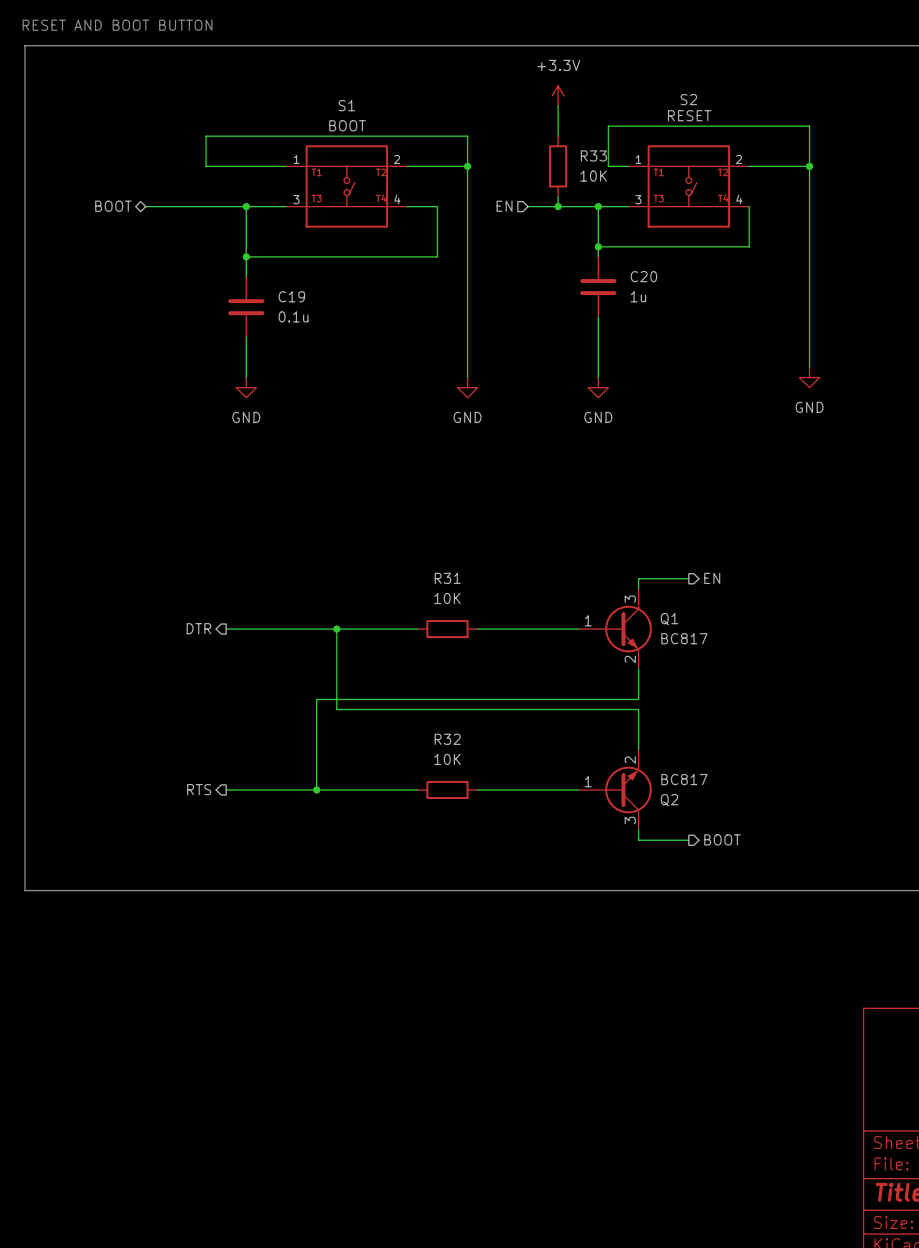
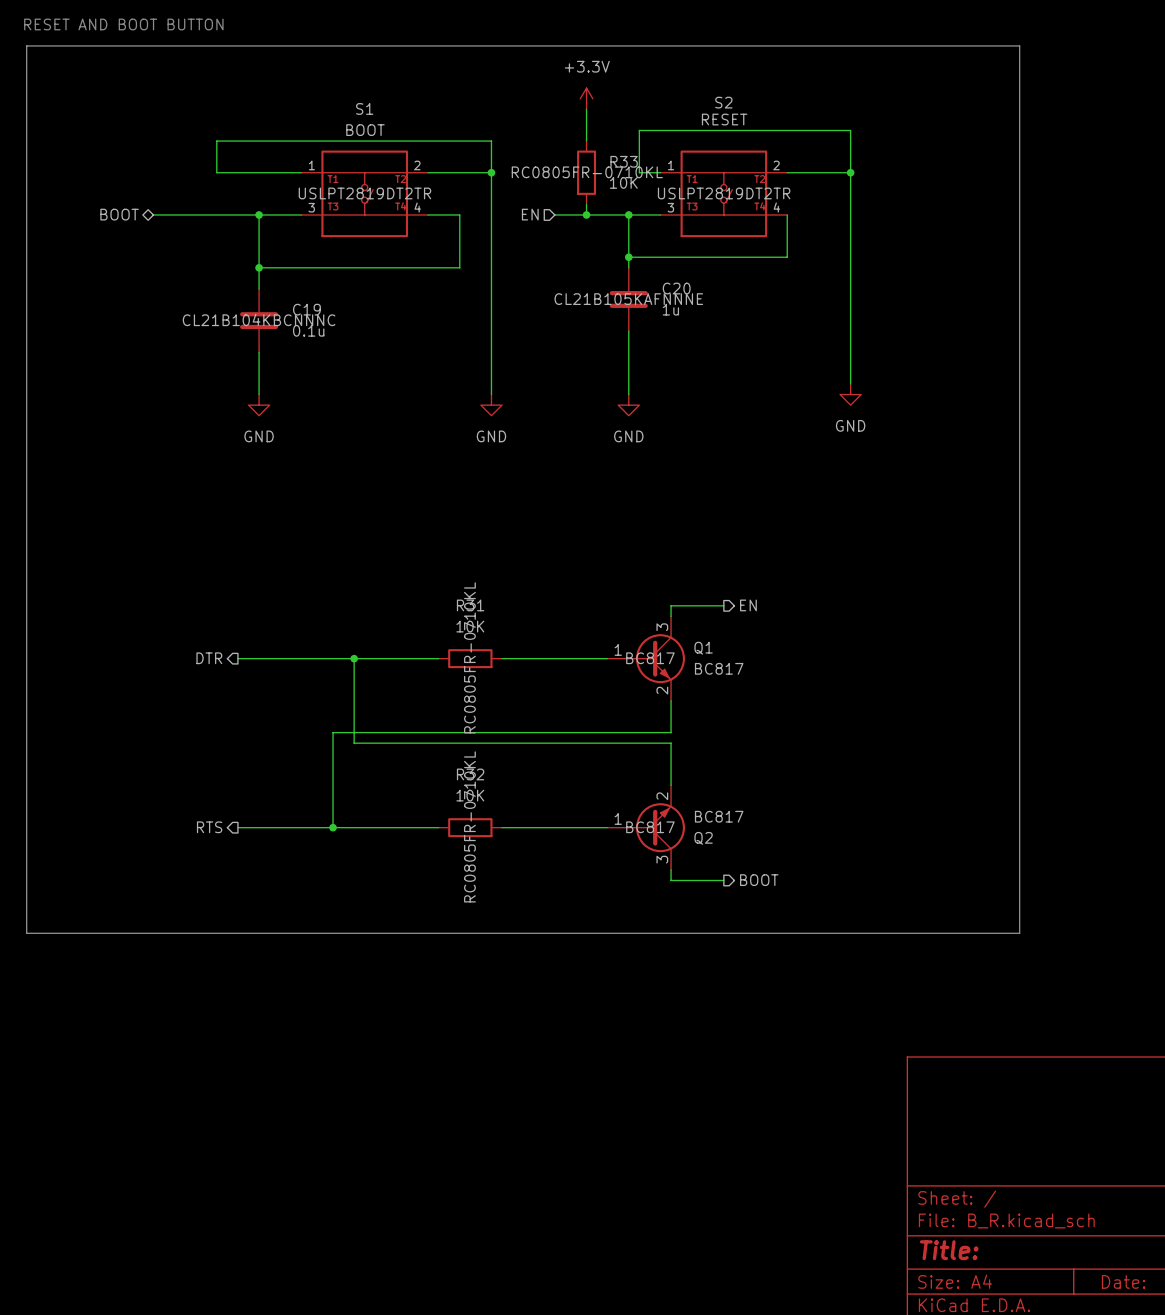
R33 text: none -> RC0805FR-0710KL (587, 172)
S1 text: none -> USLPT2819DT2TR (364, 193)
S2 text: none -> USLPT2819DT2TR (724, 193)
C20 text: none -> CL21B105KAFNNNE (628, 299)
C19 text: none -> CL21B104KBCNNNC (259, 319)
R31 text: none -> RC0805FR-0710KL (469, 657)
Q1 text: none -> BC817 (650, 658)
R32 text: none -> RC0805FR-0710KL (469, 826)
Q2 text: none -> BC817 (650, 827)

